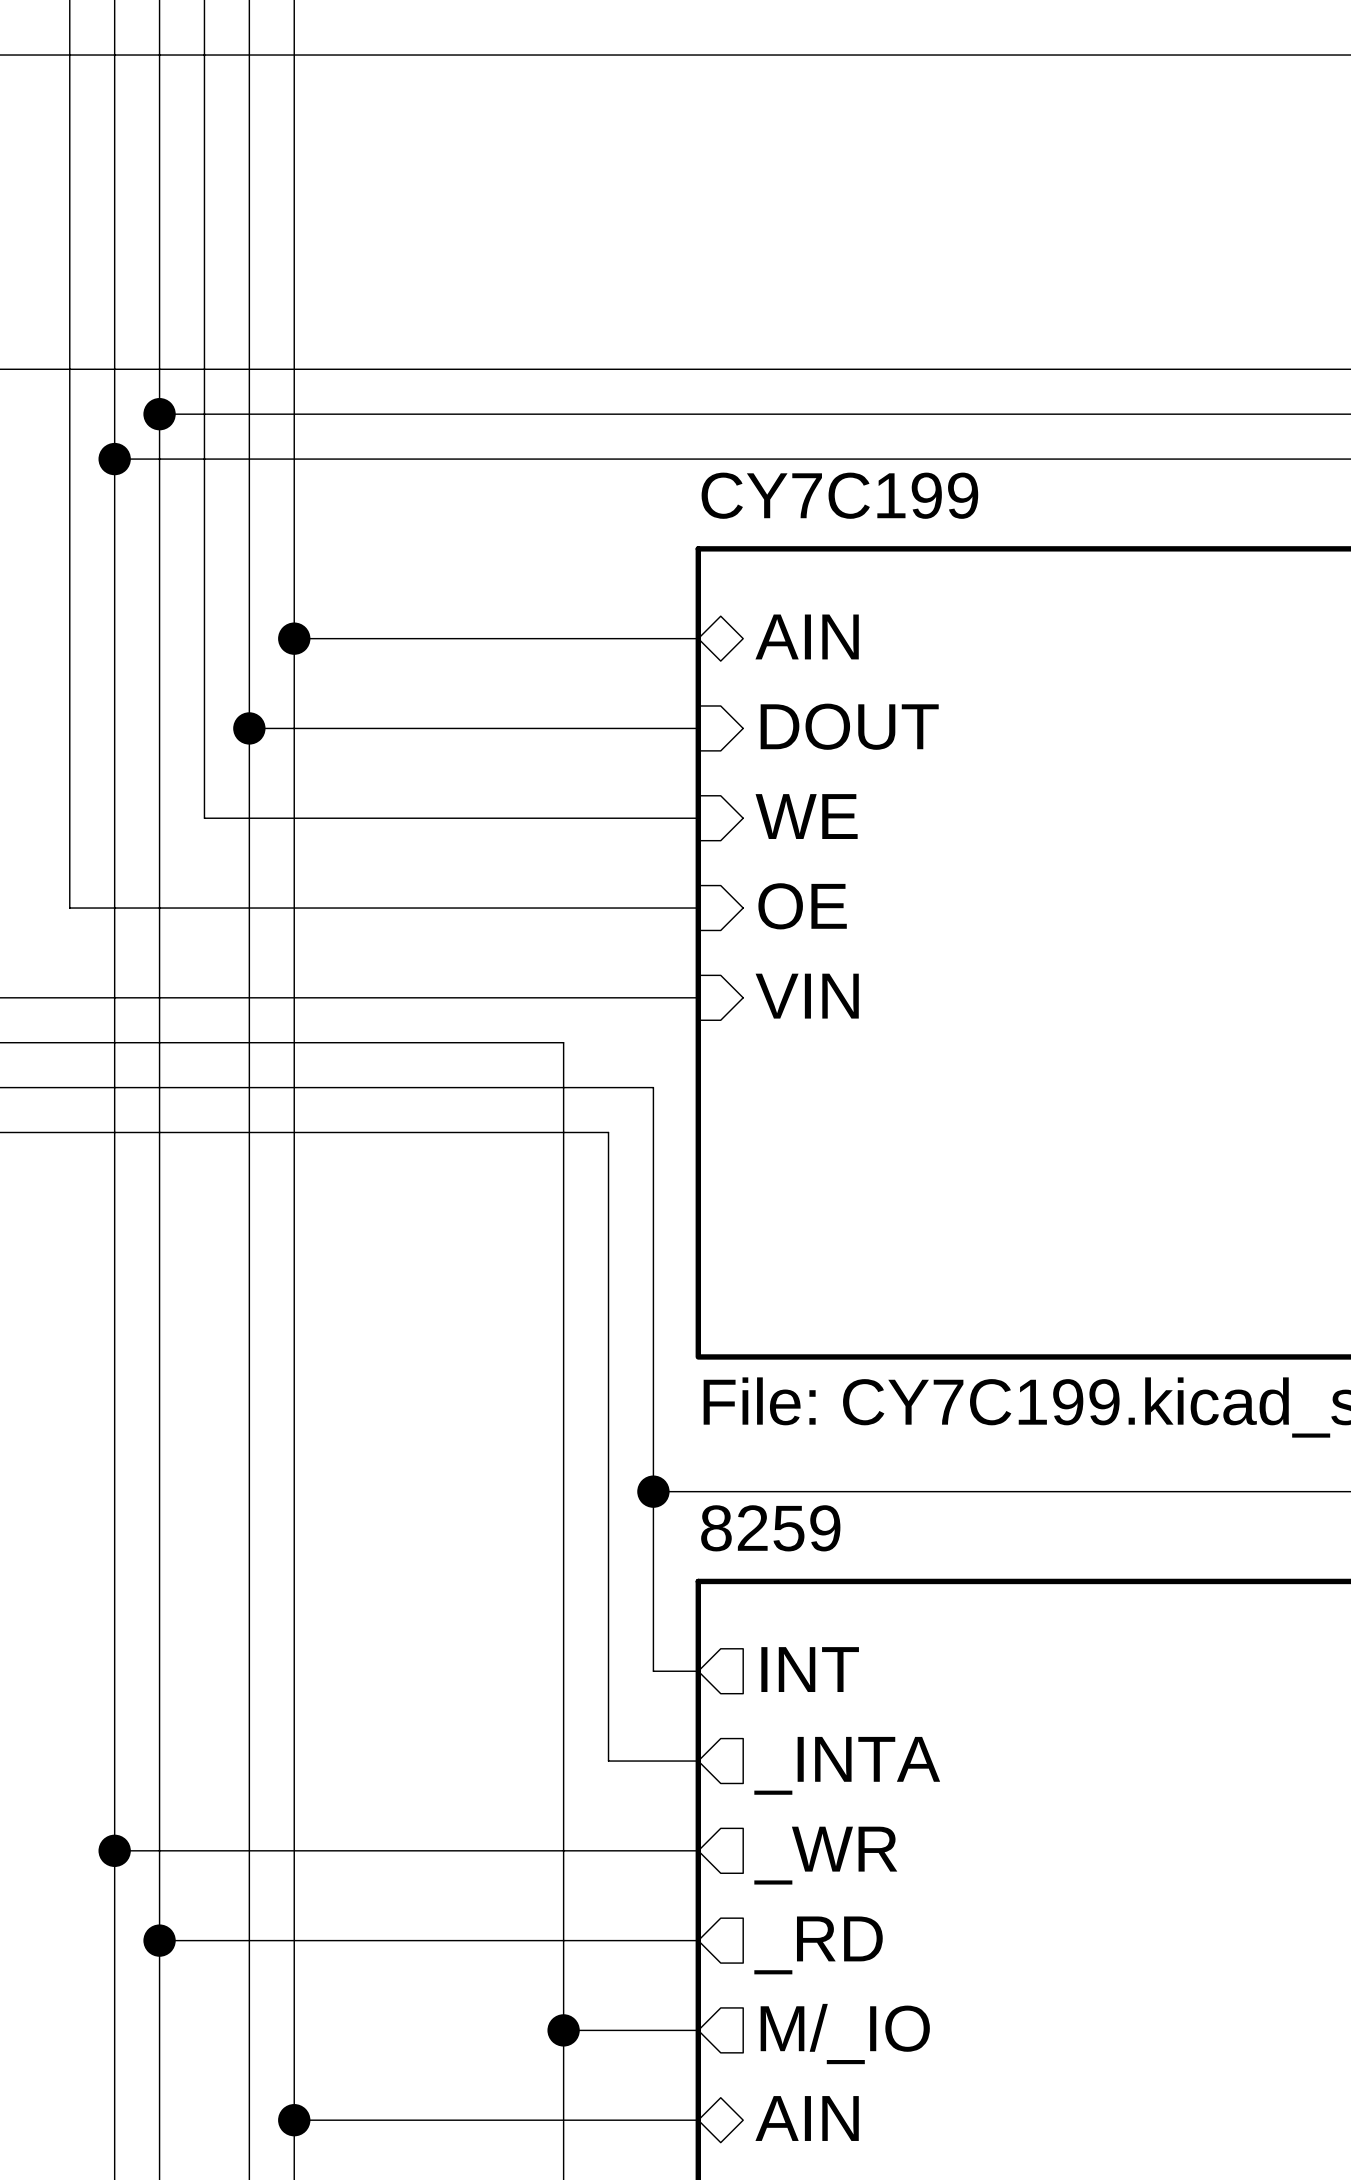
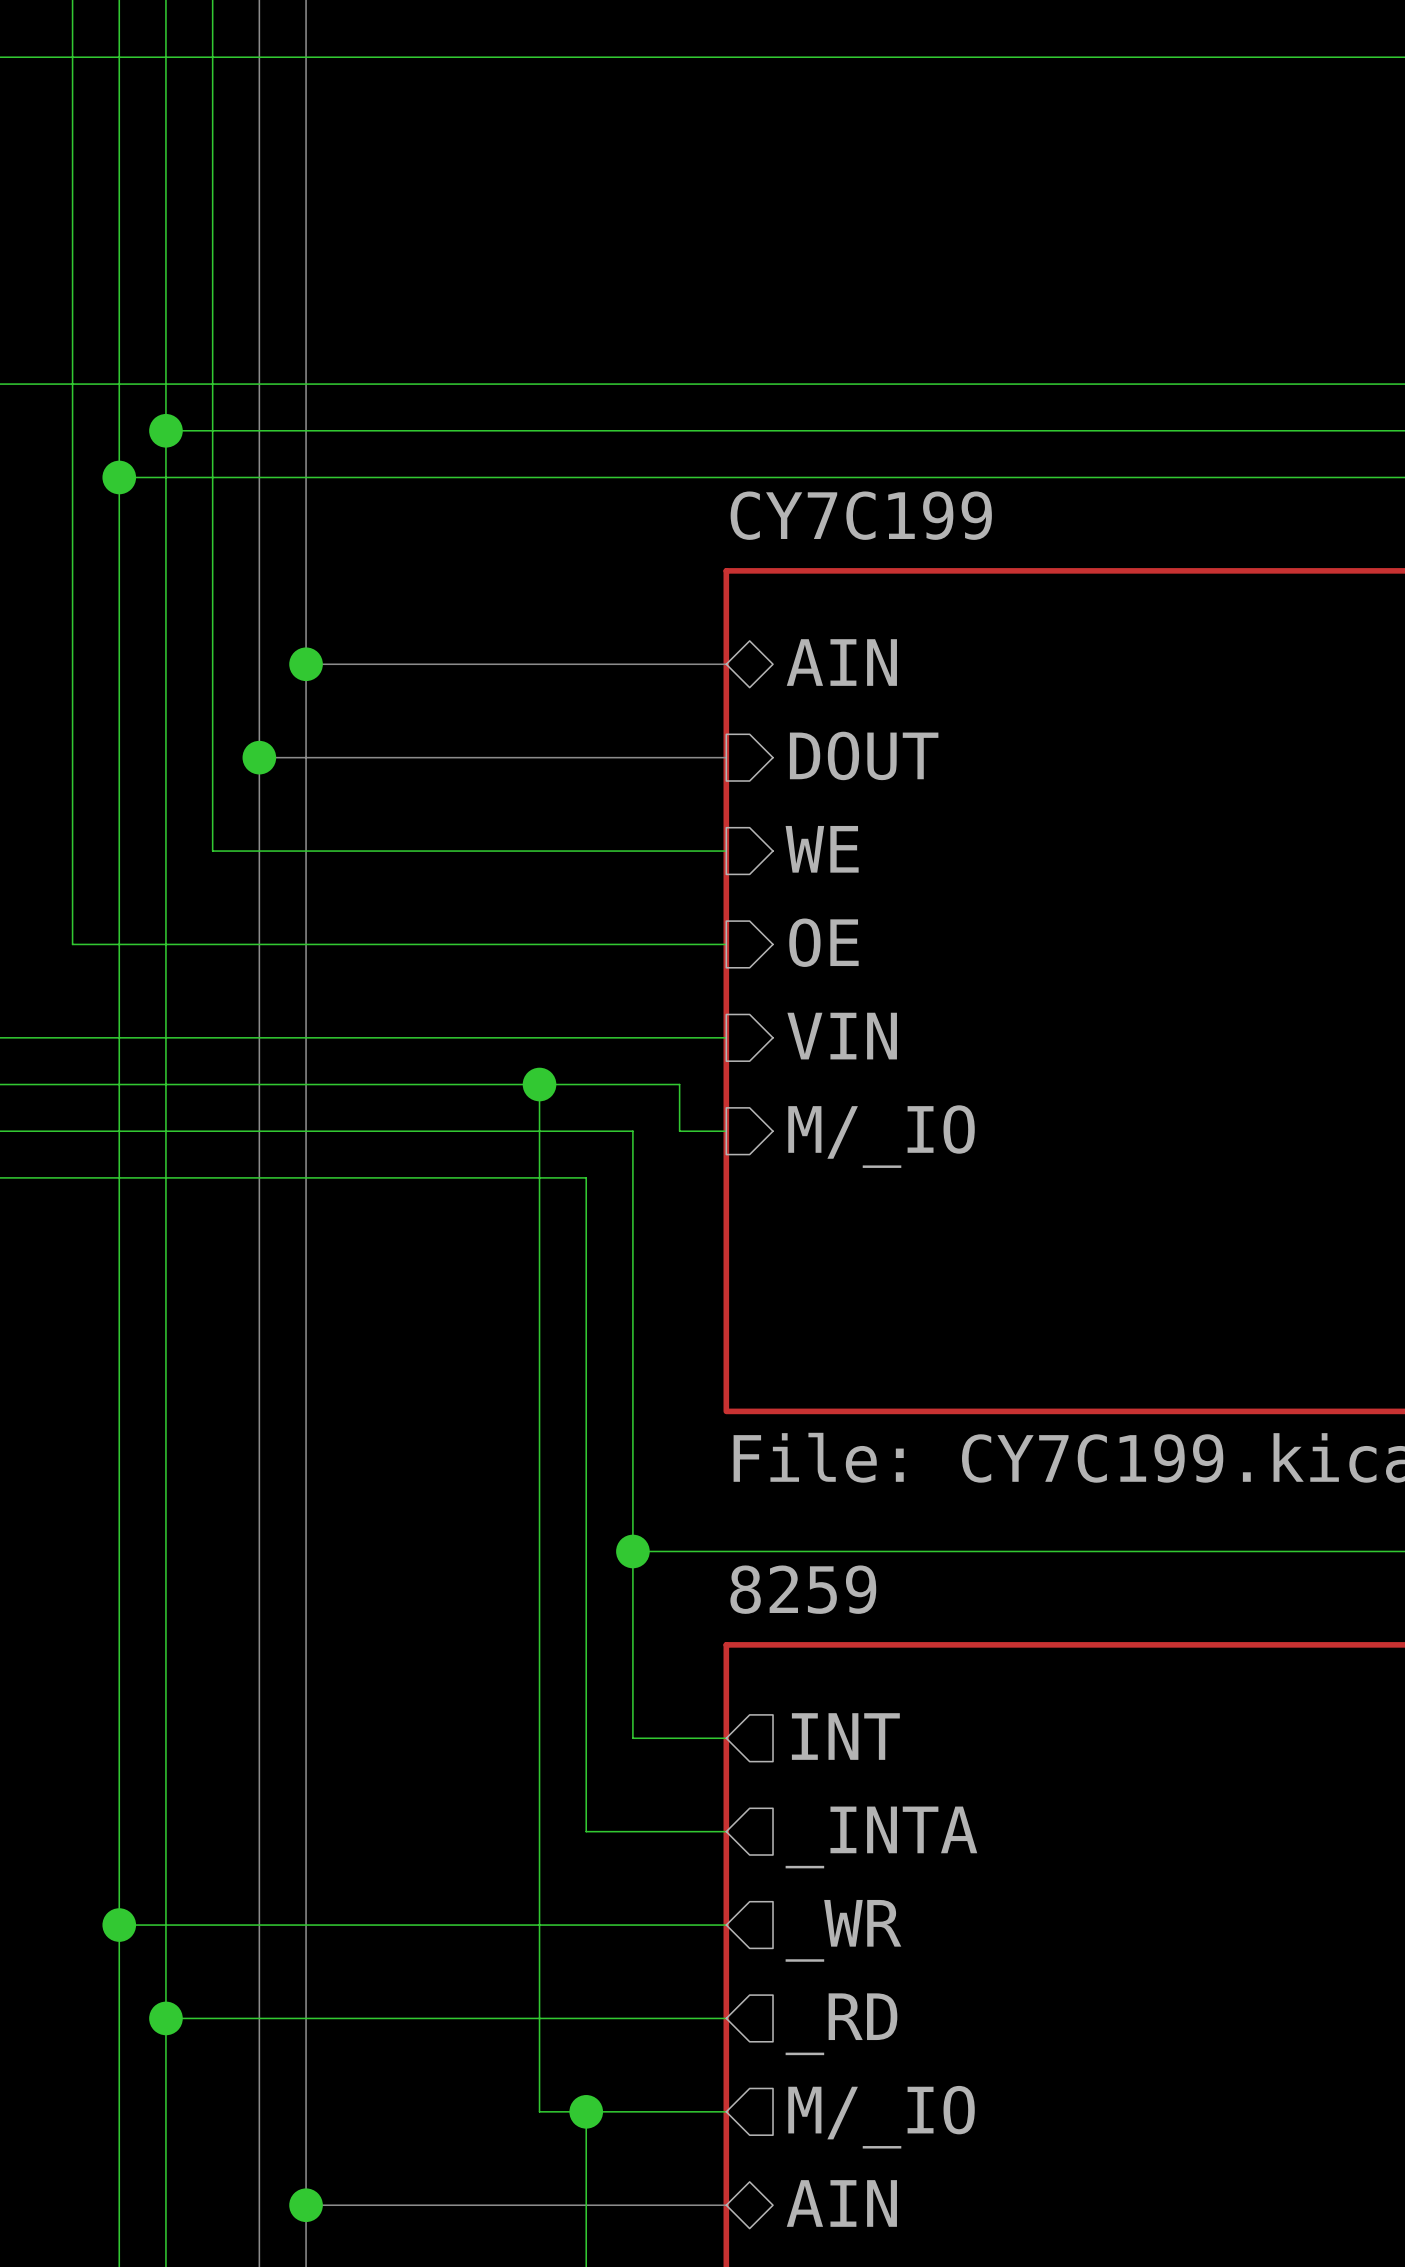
wire: none -> (539, 1084) (539, 2111) (586, 2111)
junction: none -> (539, 1084)
wire: (563, 1042) (563, 1132) (608, 1132) -> (632, 1131) (632, 1177)
wire: none -> (586, 1084) (679, 1084) (679, 1131) (726, 1131)
wire: (608, 1087) (653, 1087) (653, 1671) -> none
sheet pin: none -> M/_IO (881, 1136)
wire: none -> (632, 1551) (679, 1551)
junction position: (653, 1491) -> (632, 1551)
wire: (608, 1671) (608, 1761) -> (632, 1738) (679, 1738)
wire: (563, 1761) (563, 2030) -> (586, 1831) (632, 1831)

